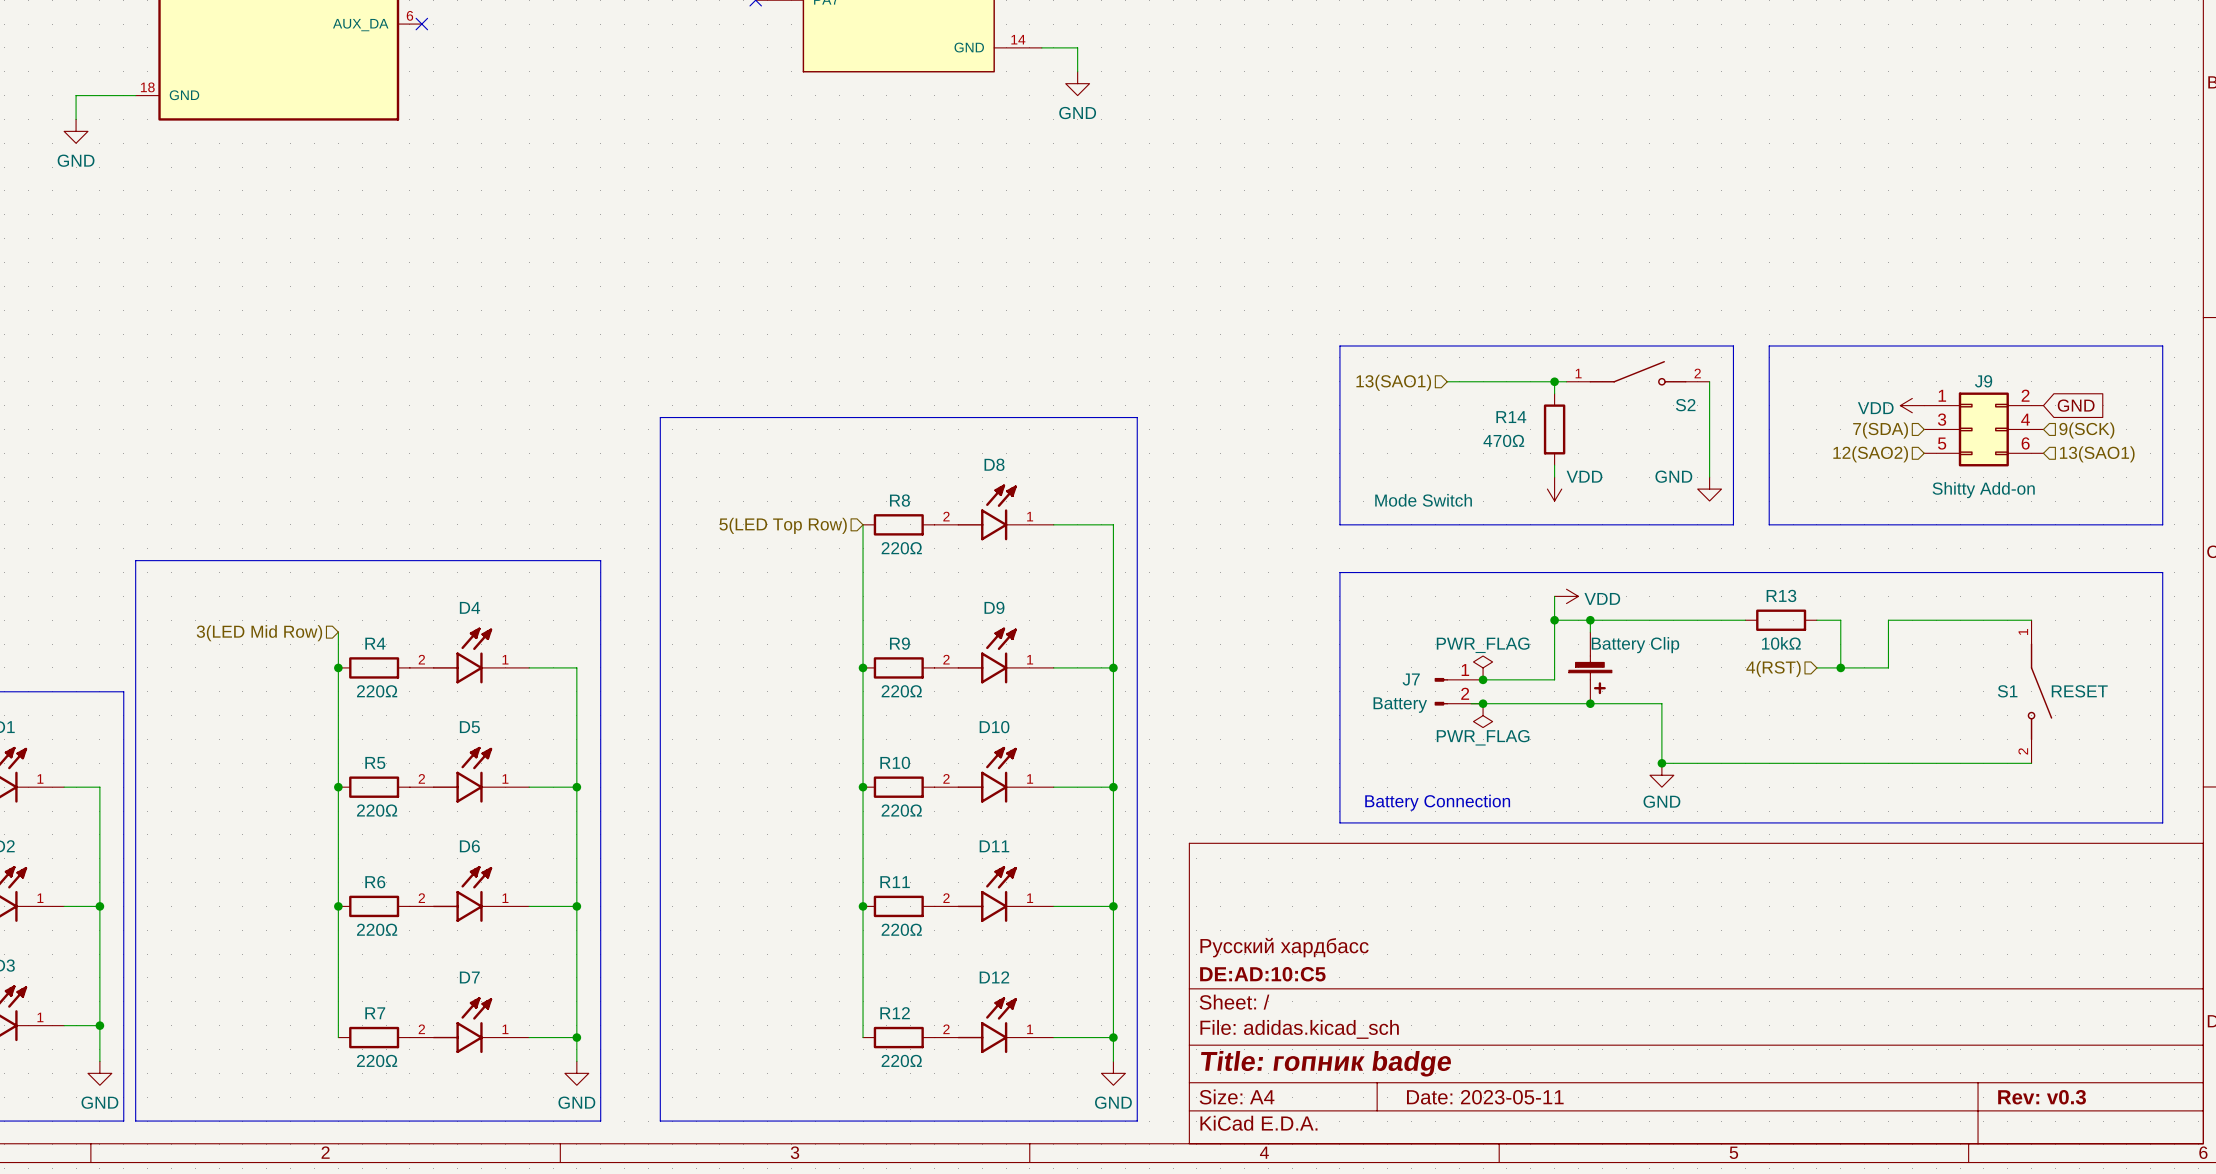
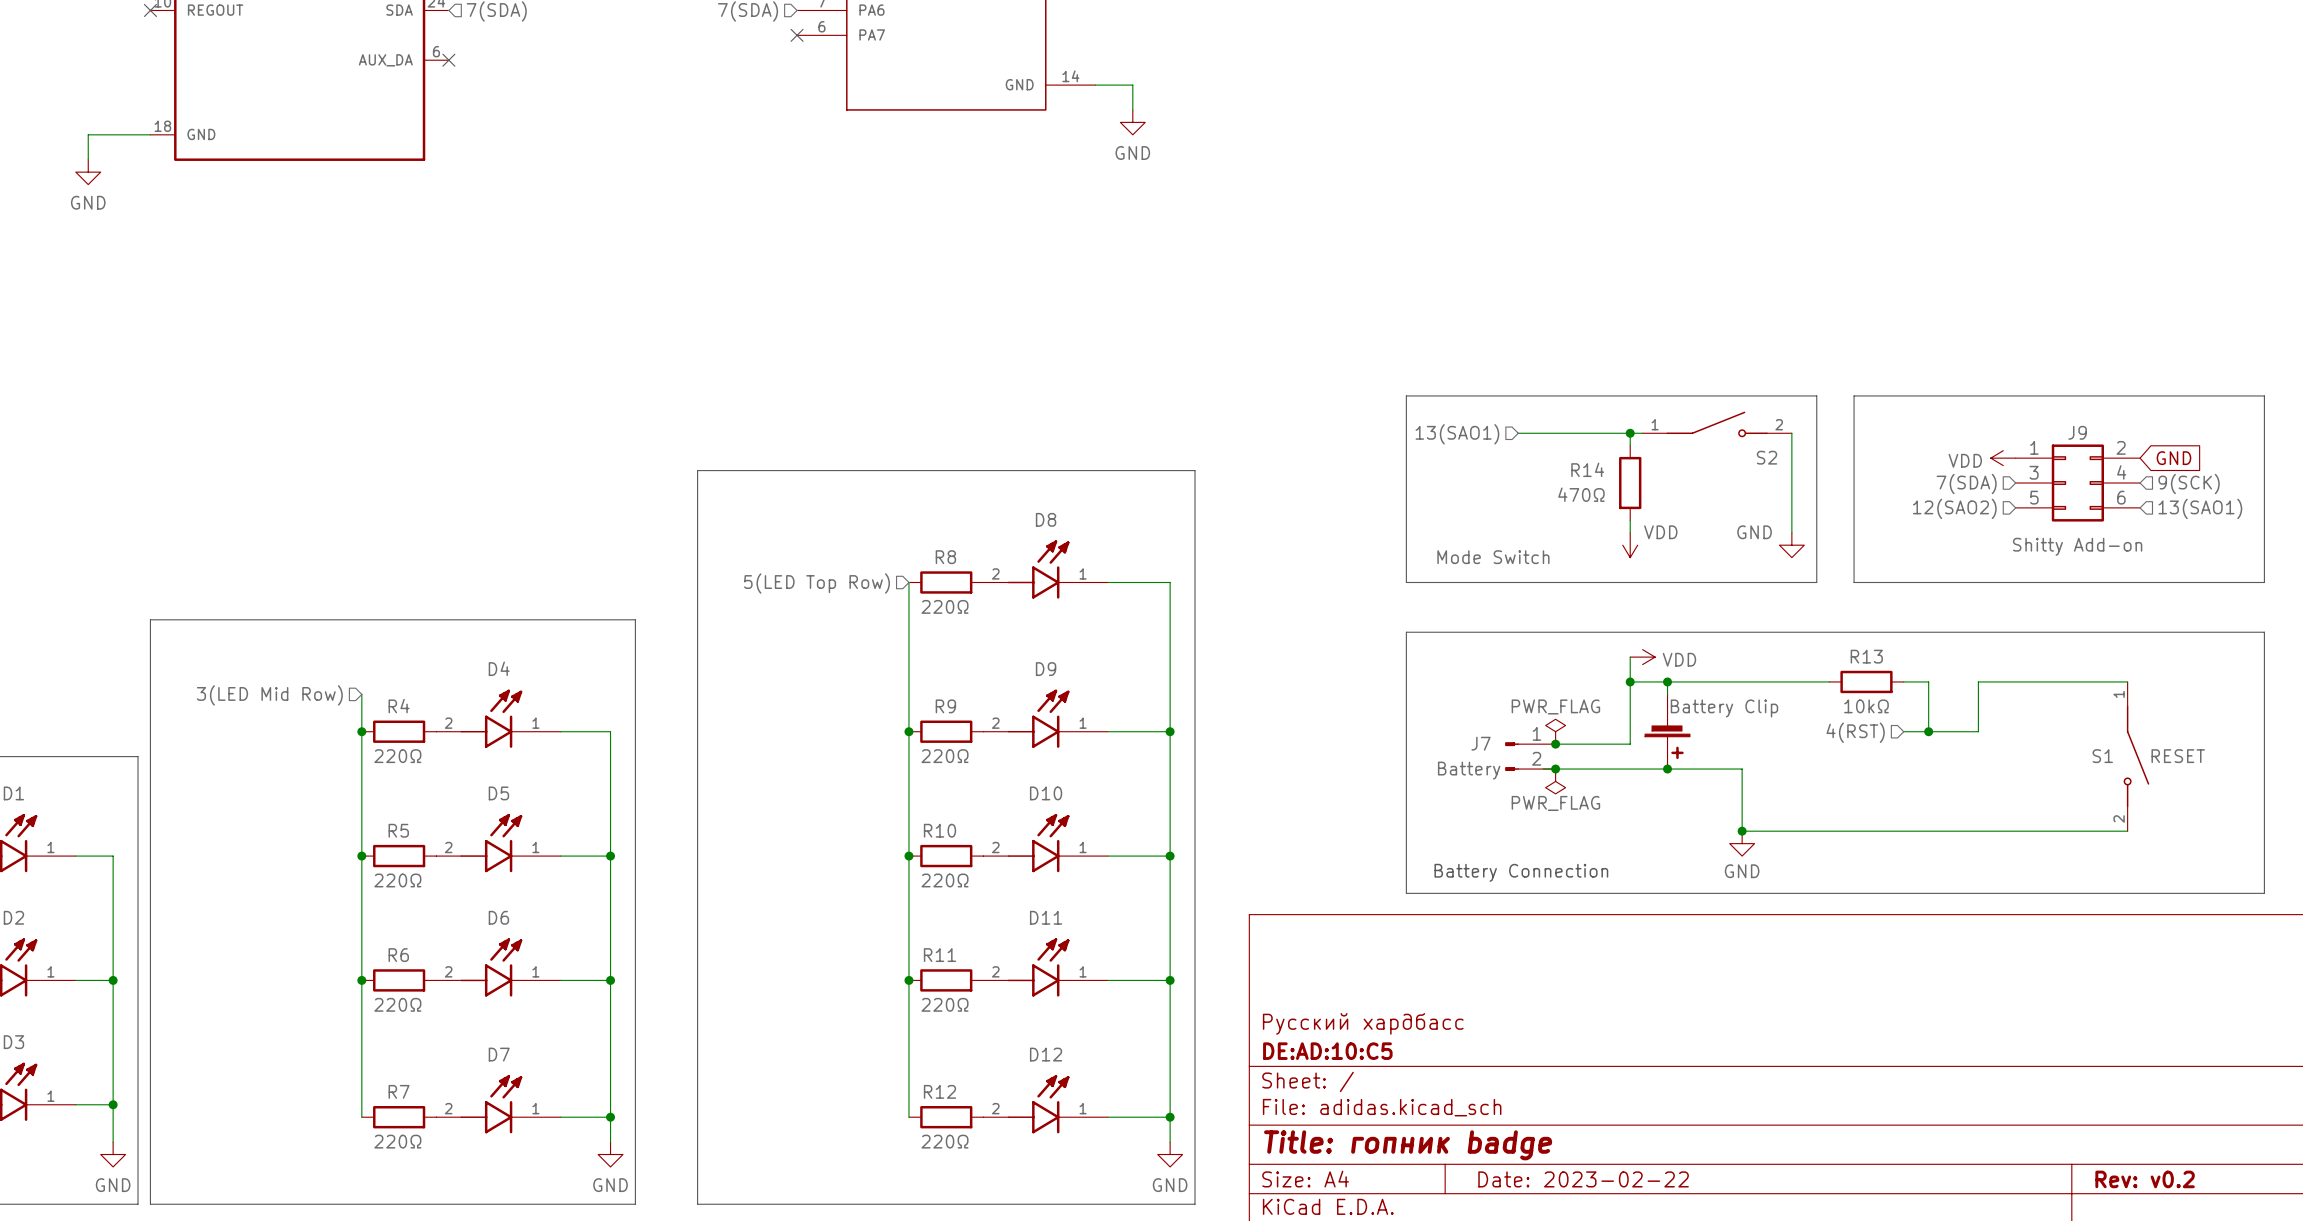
title block: Date: 2023-05-11 (1485, 1097) -> Date: 2023-02-22 (1583, 1179)
title block: Rev: v0.3 (2042, 1097) -> Rev: v0.2 (2145, 1179)

